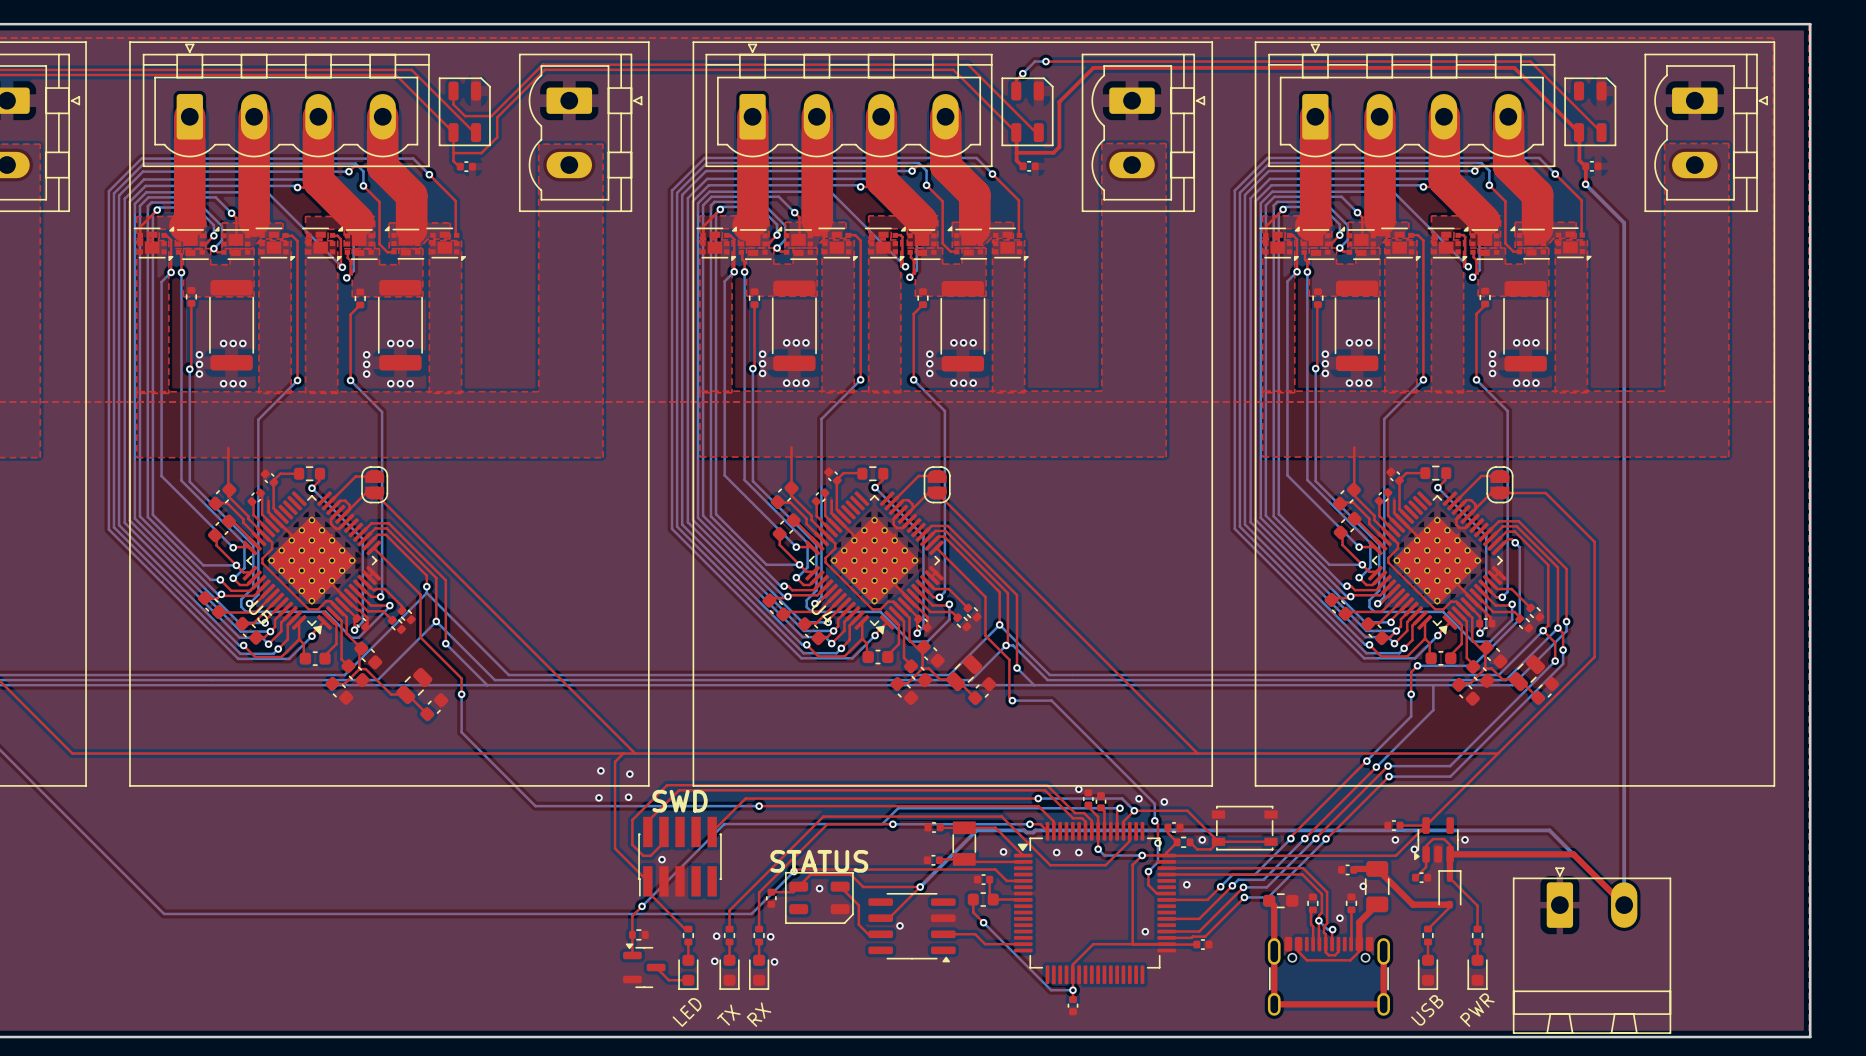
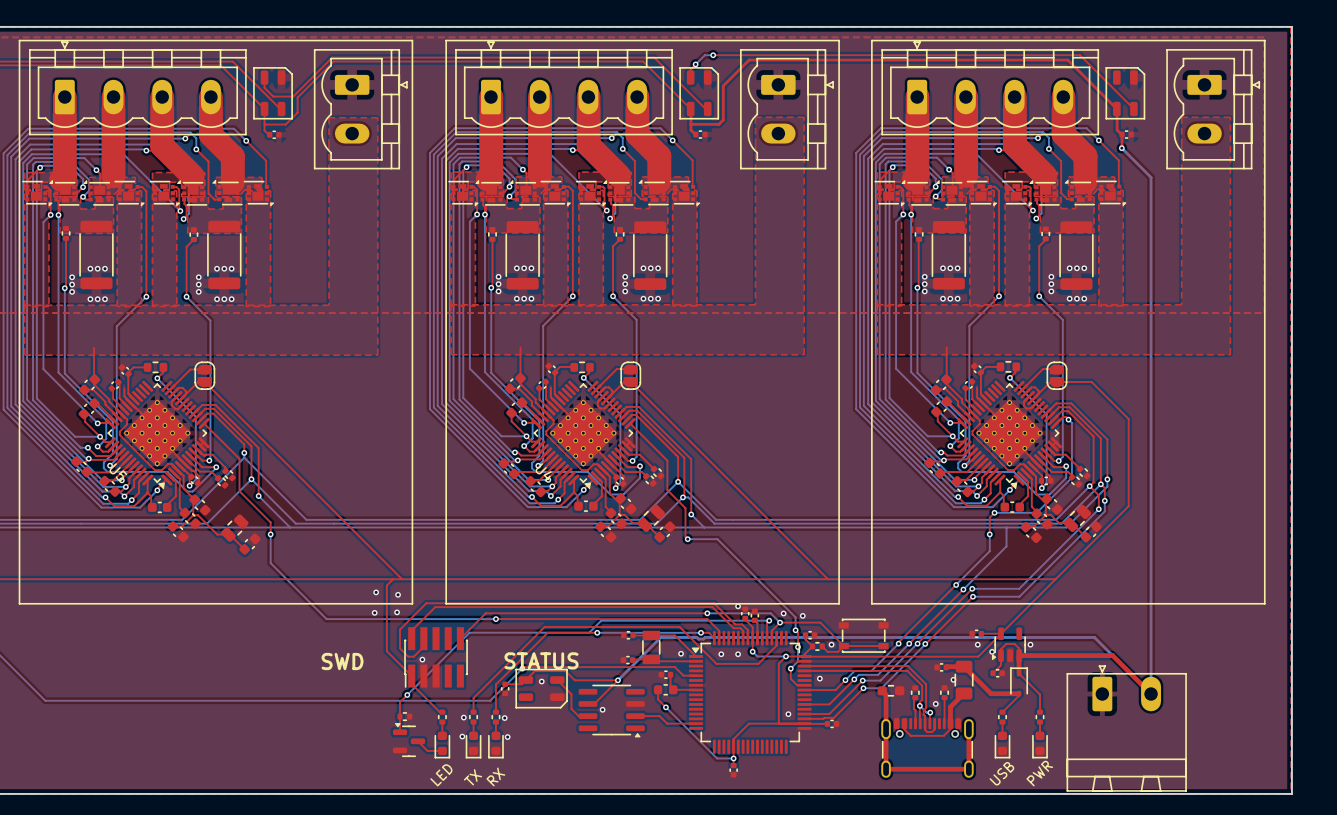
text position: SWD (680, 801) -> SWD (342, 661)

